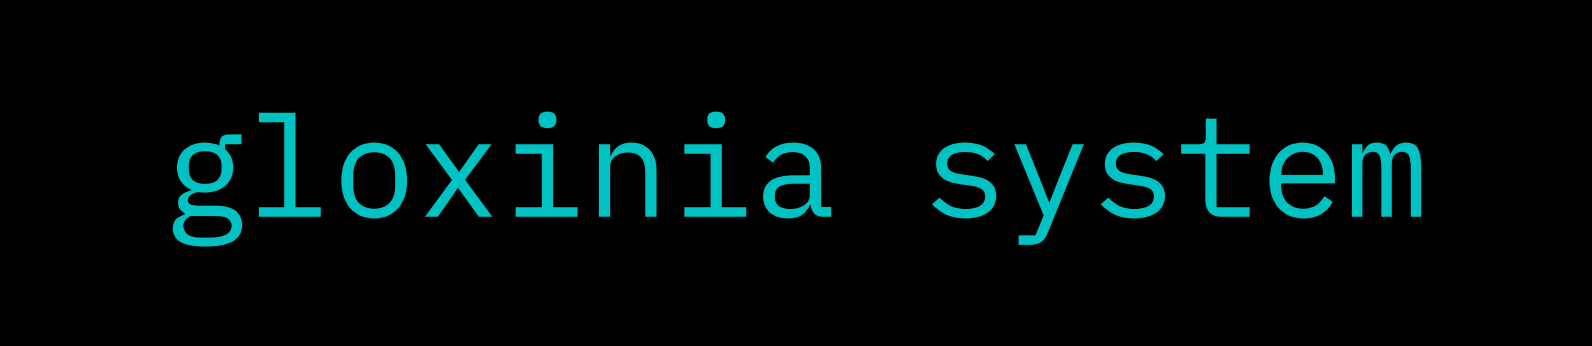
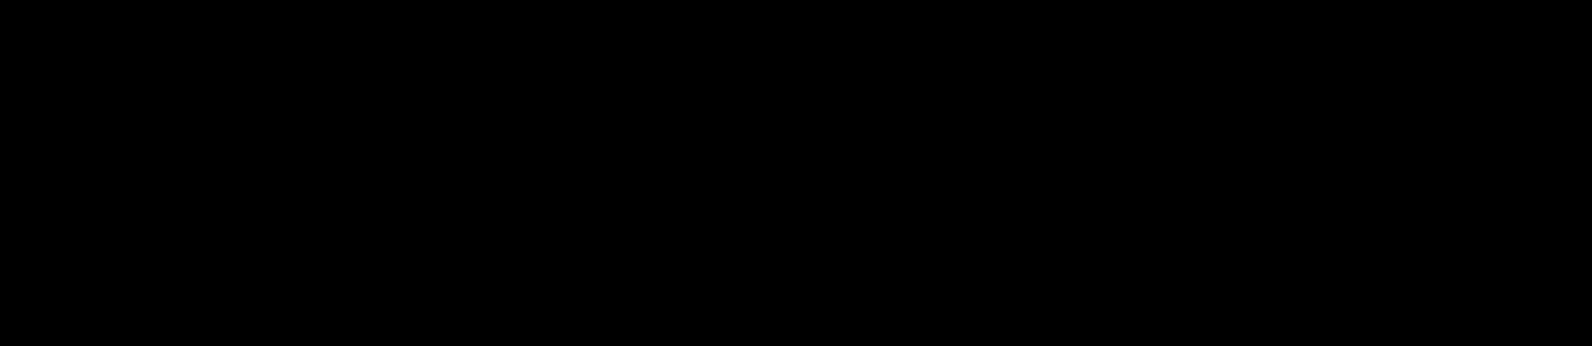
text: gloxinia system (796, 179) -> none

